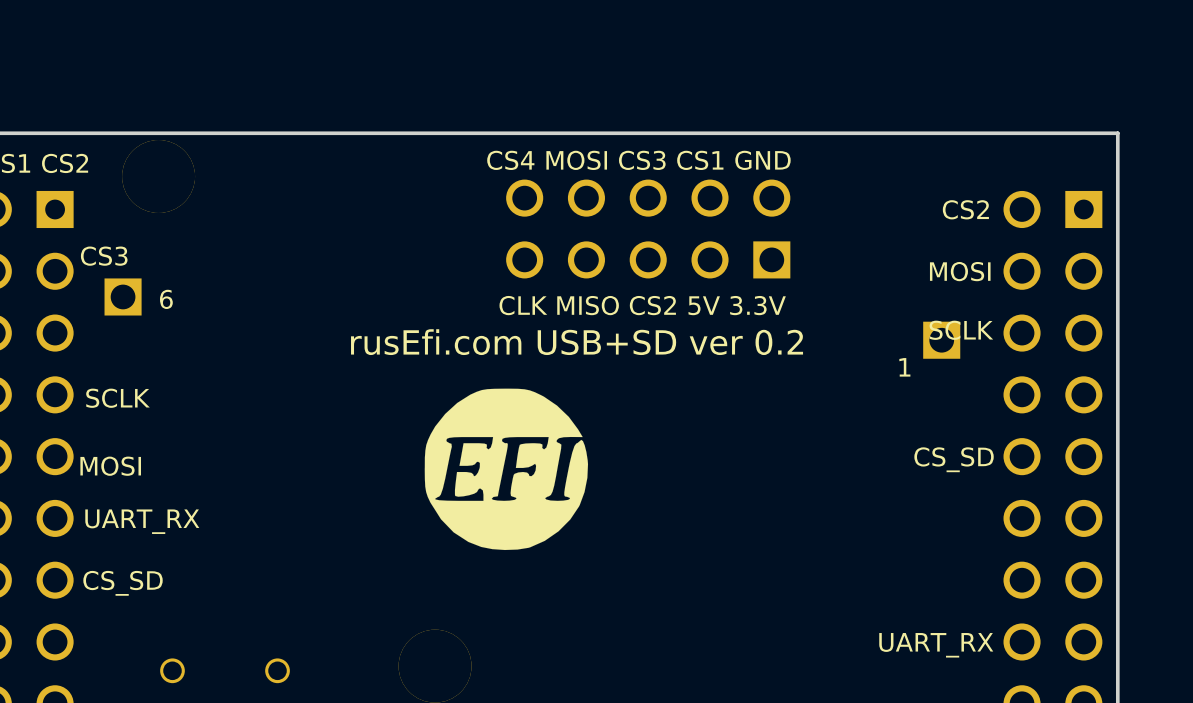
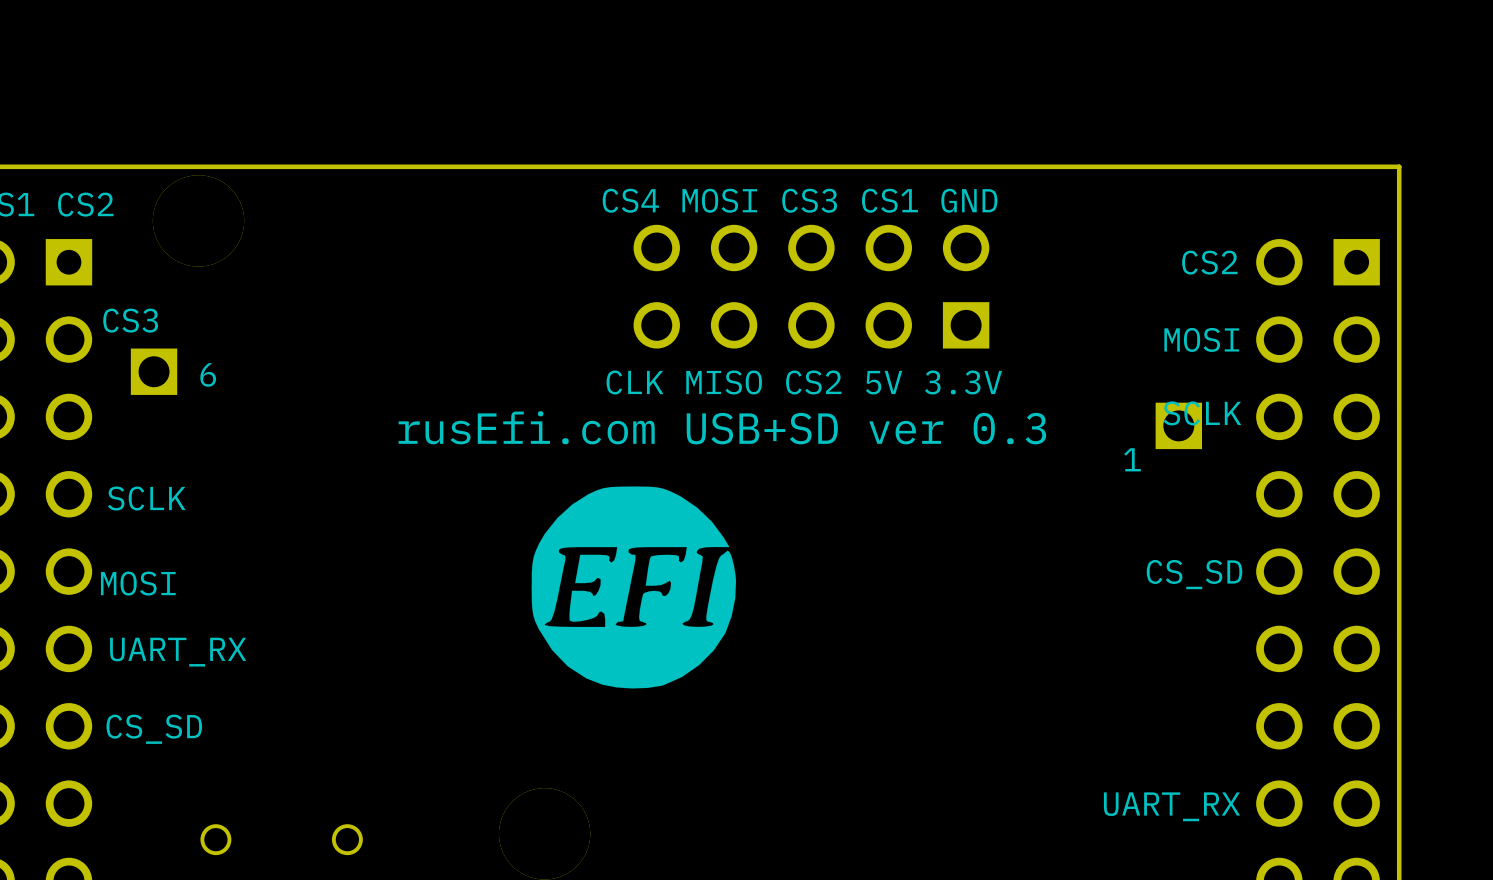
text: rusEfi.com USB+SD ver 0.2 (577, 342) -> rusEfi.com USB+SD ver 0.3 (722, 427)

